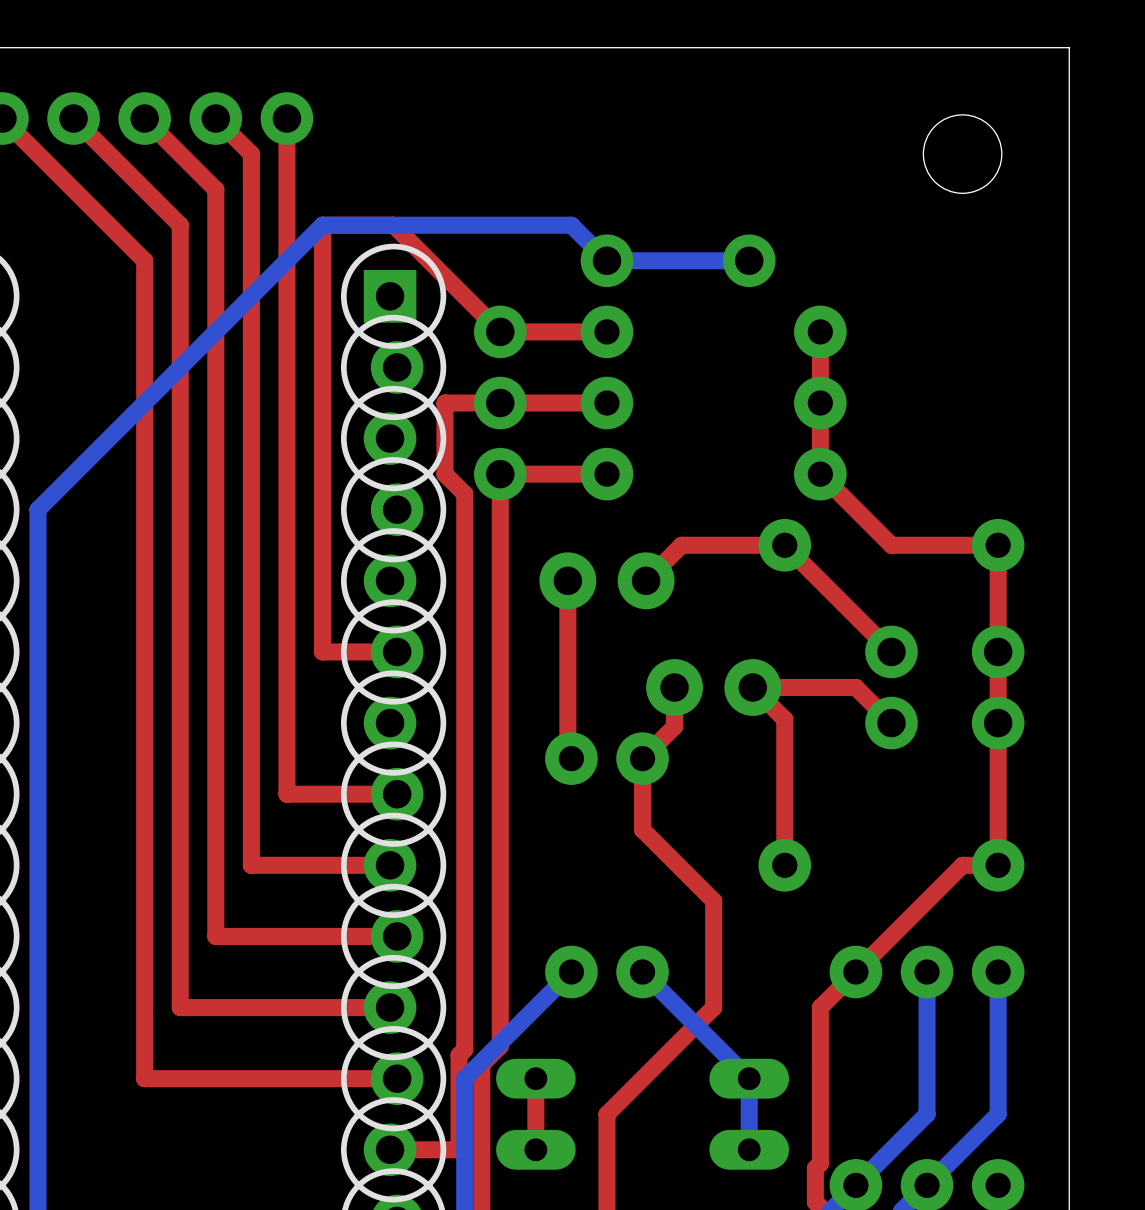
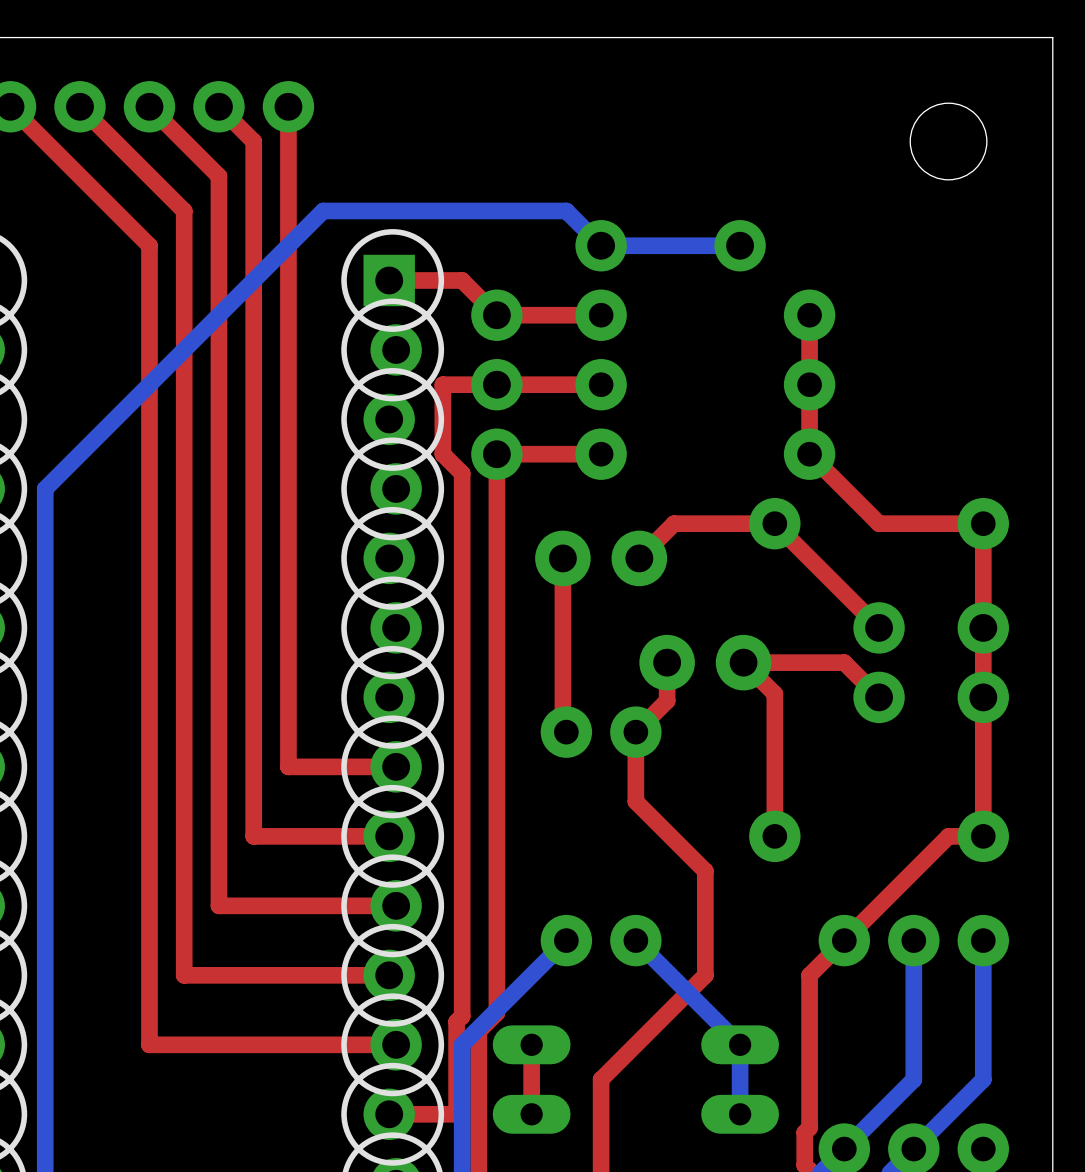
top track: (464, 296) (393, 225) (322, 225) (322, 651) (397, 651) -> (462, 280) (389, 280)

